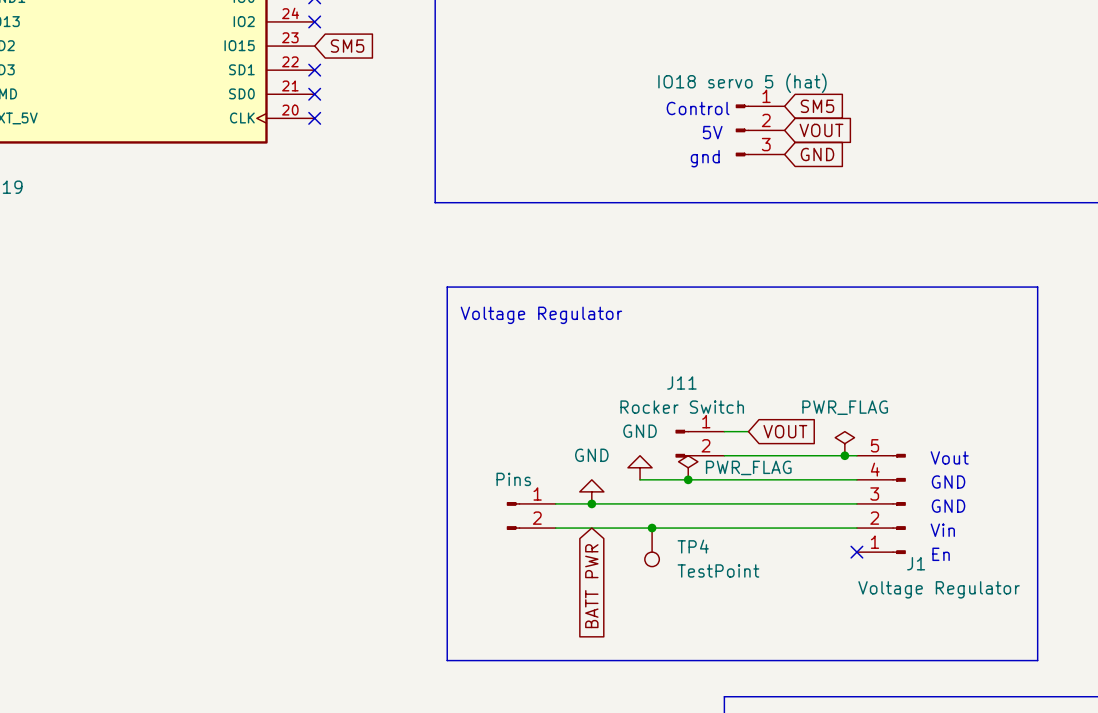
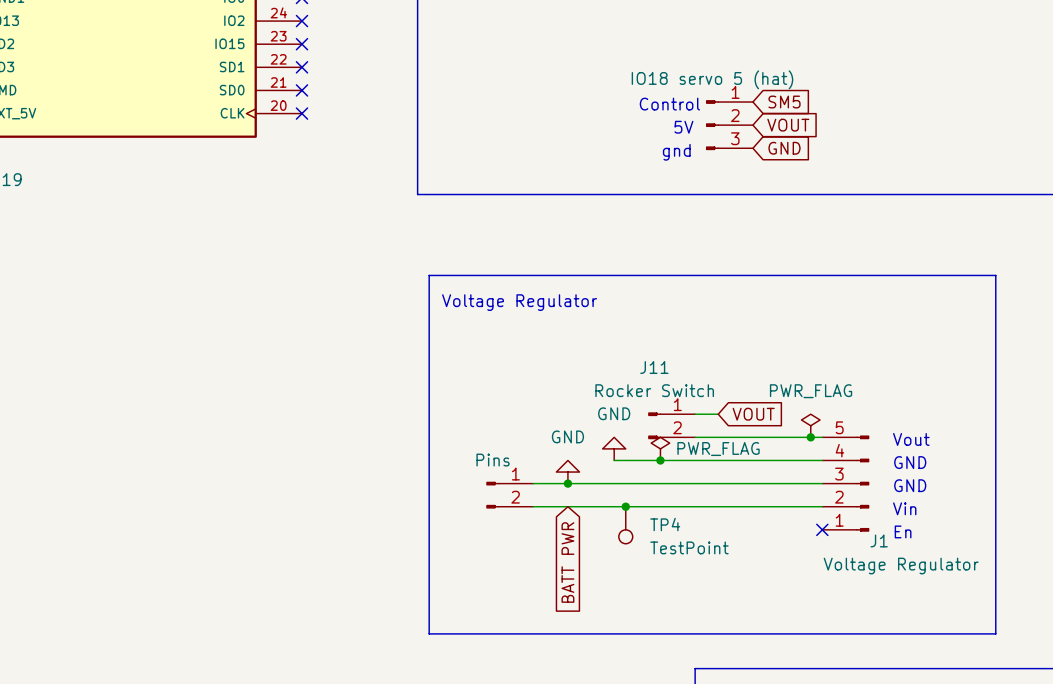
no-connect mark: none -> (301, 44)
global label: SM5 (347, 46) -> none

